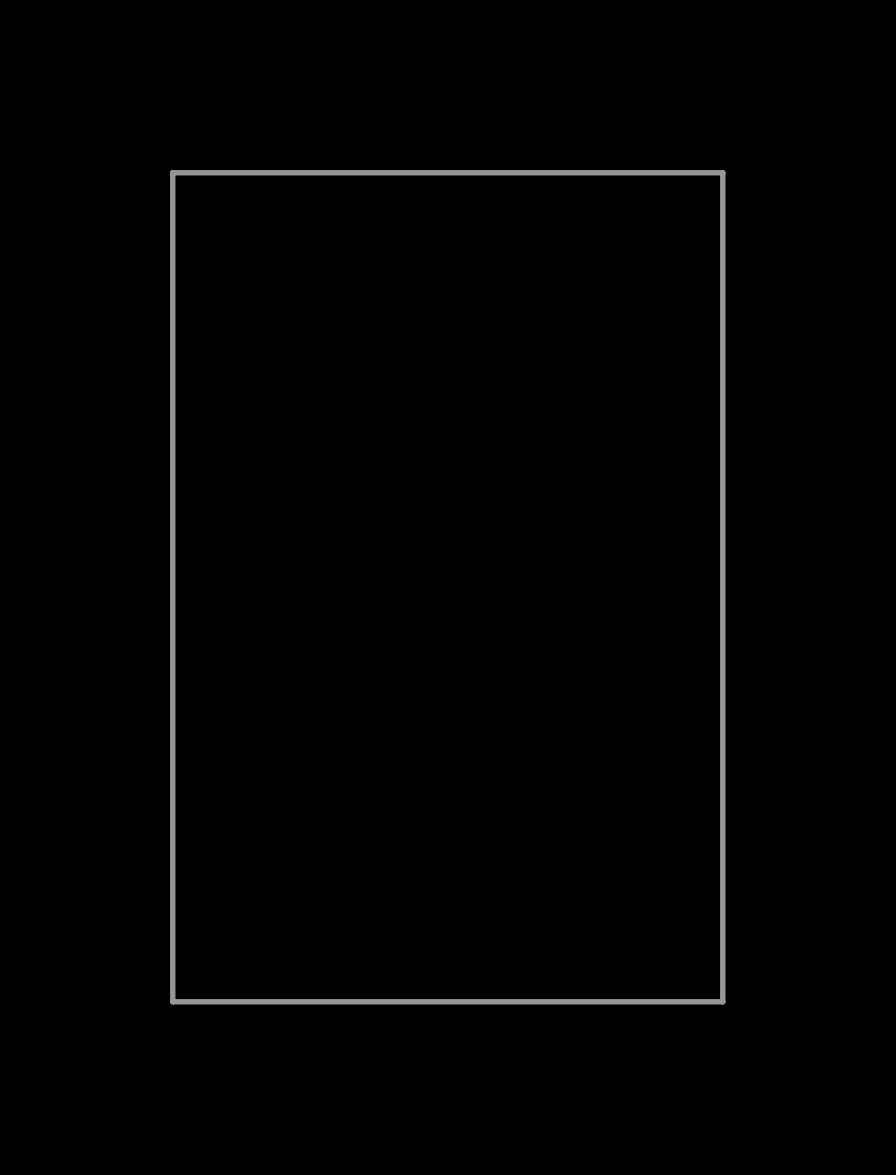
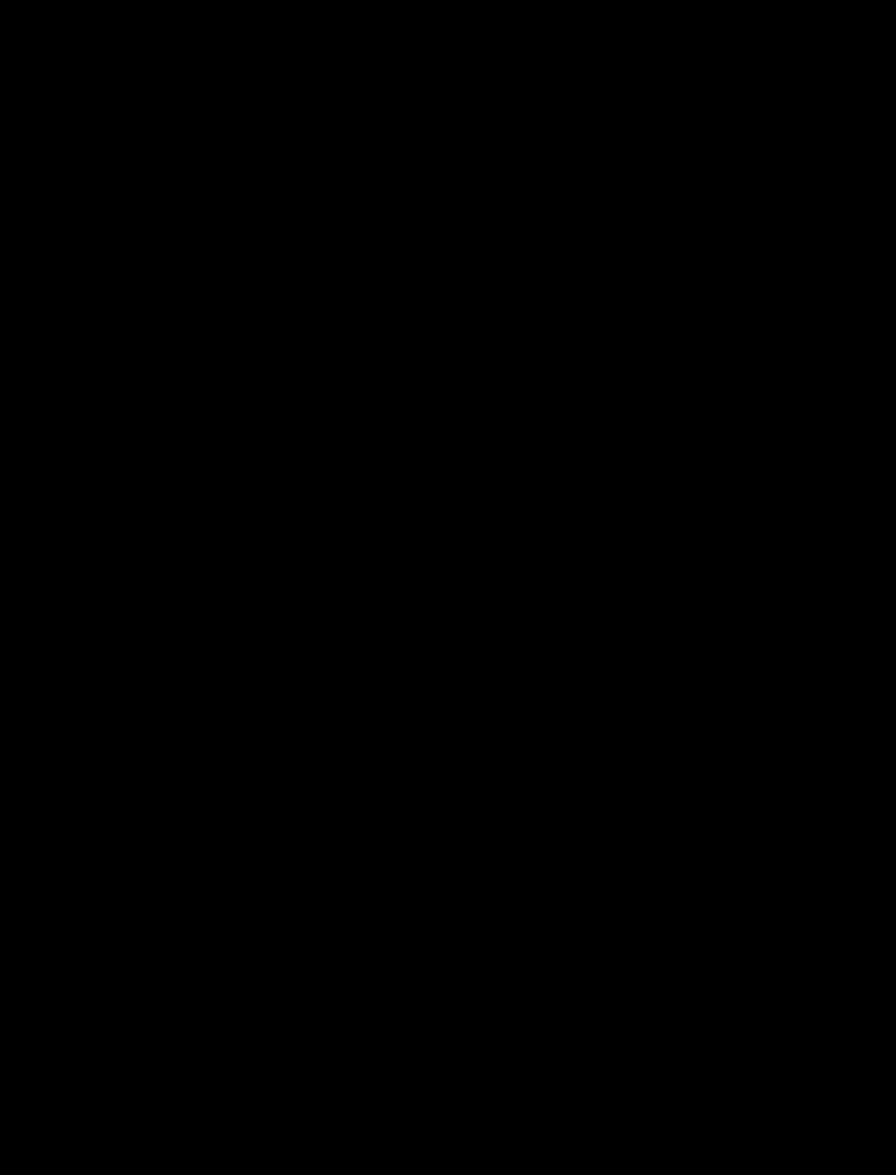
line: (172, 172) (722, 172) (722, 1001) (172, 1001) (172, 172) -> none

